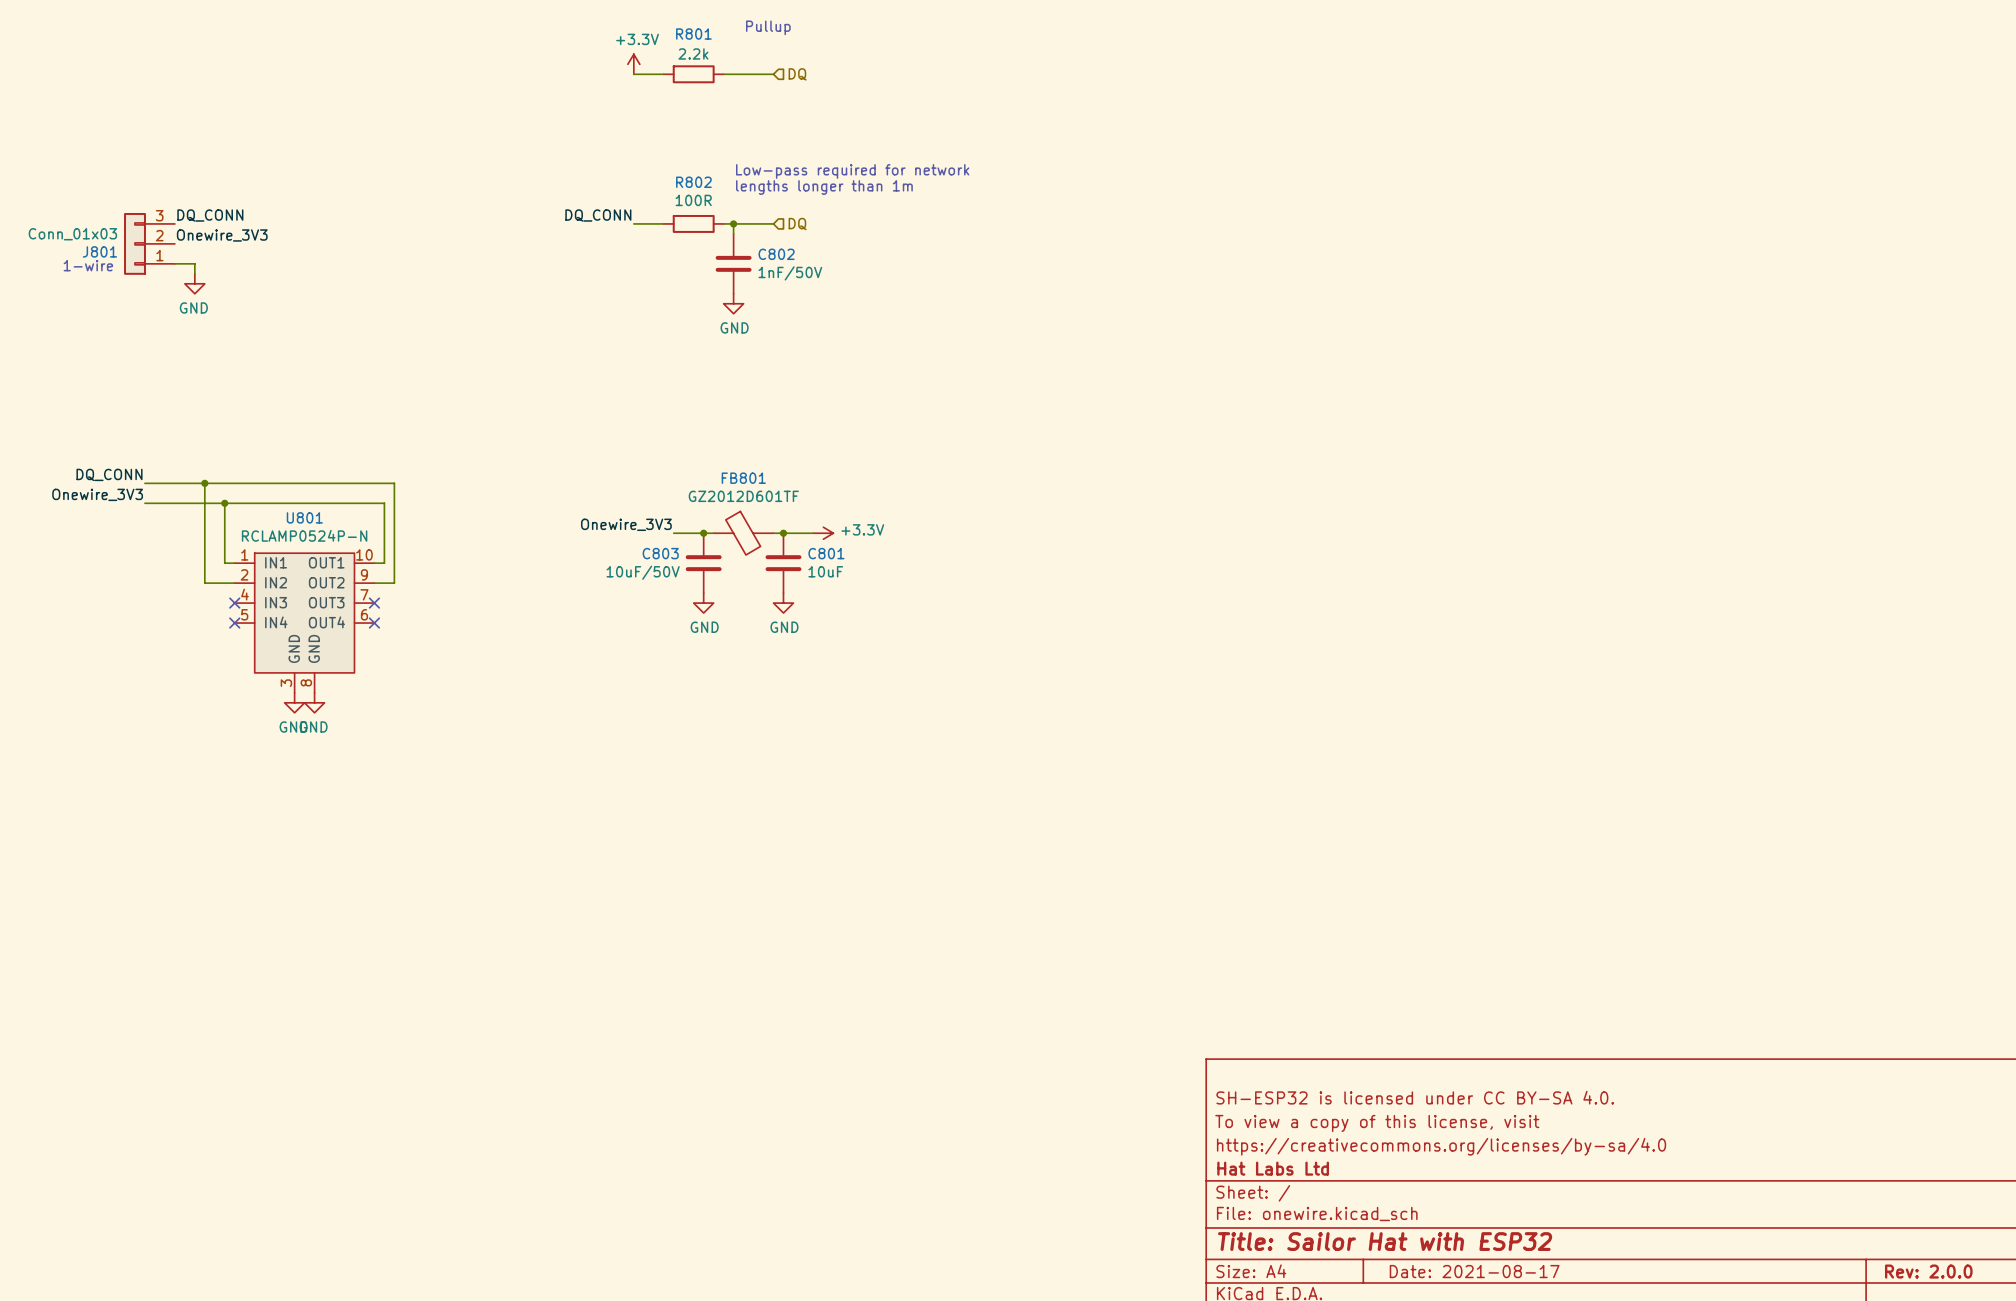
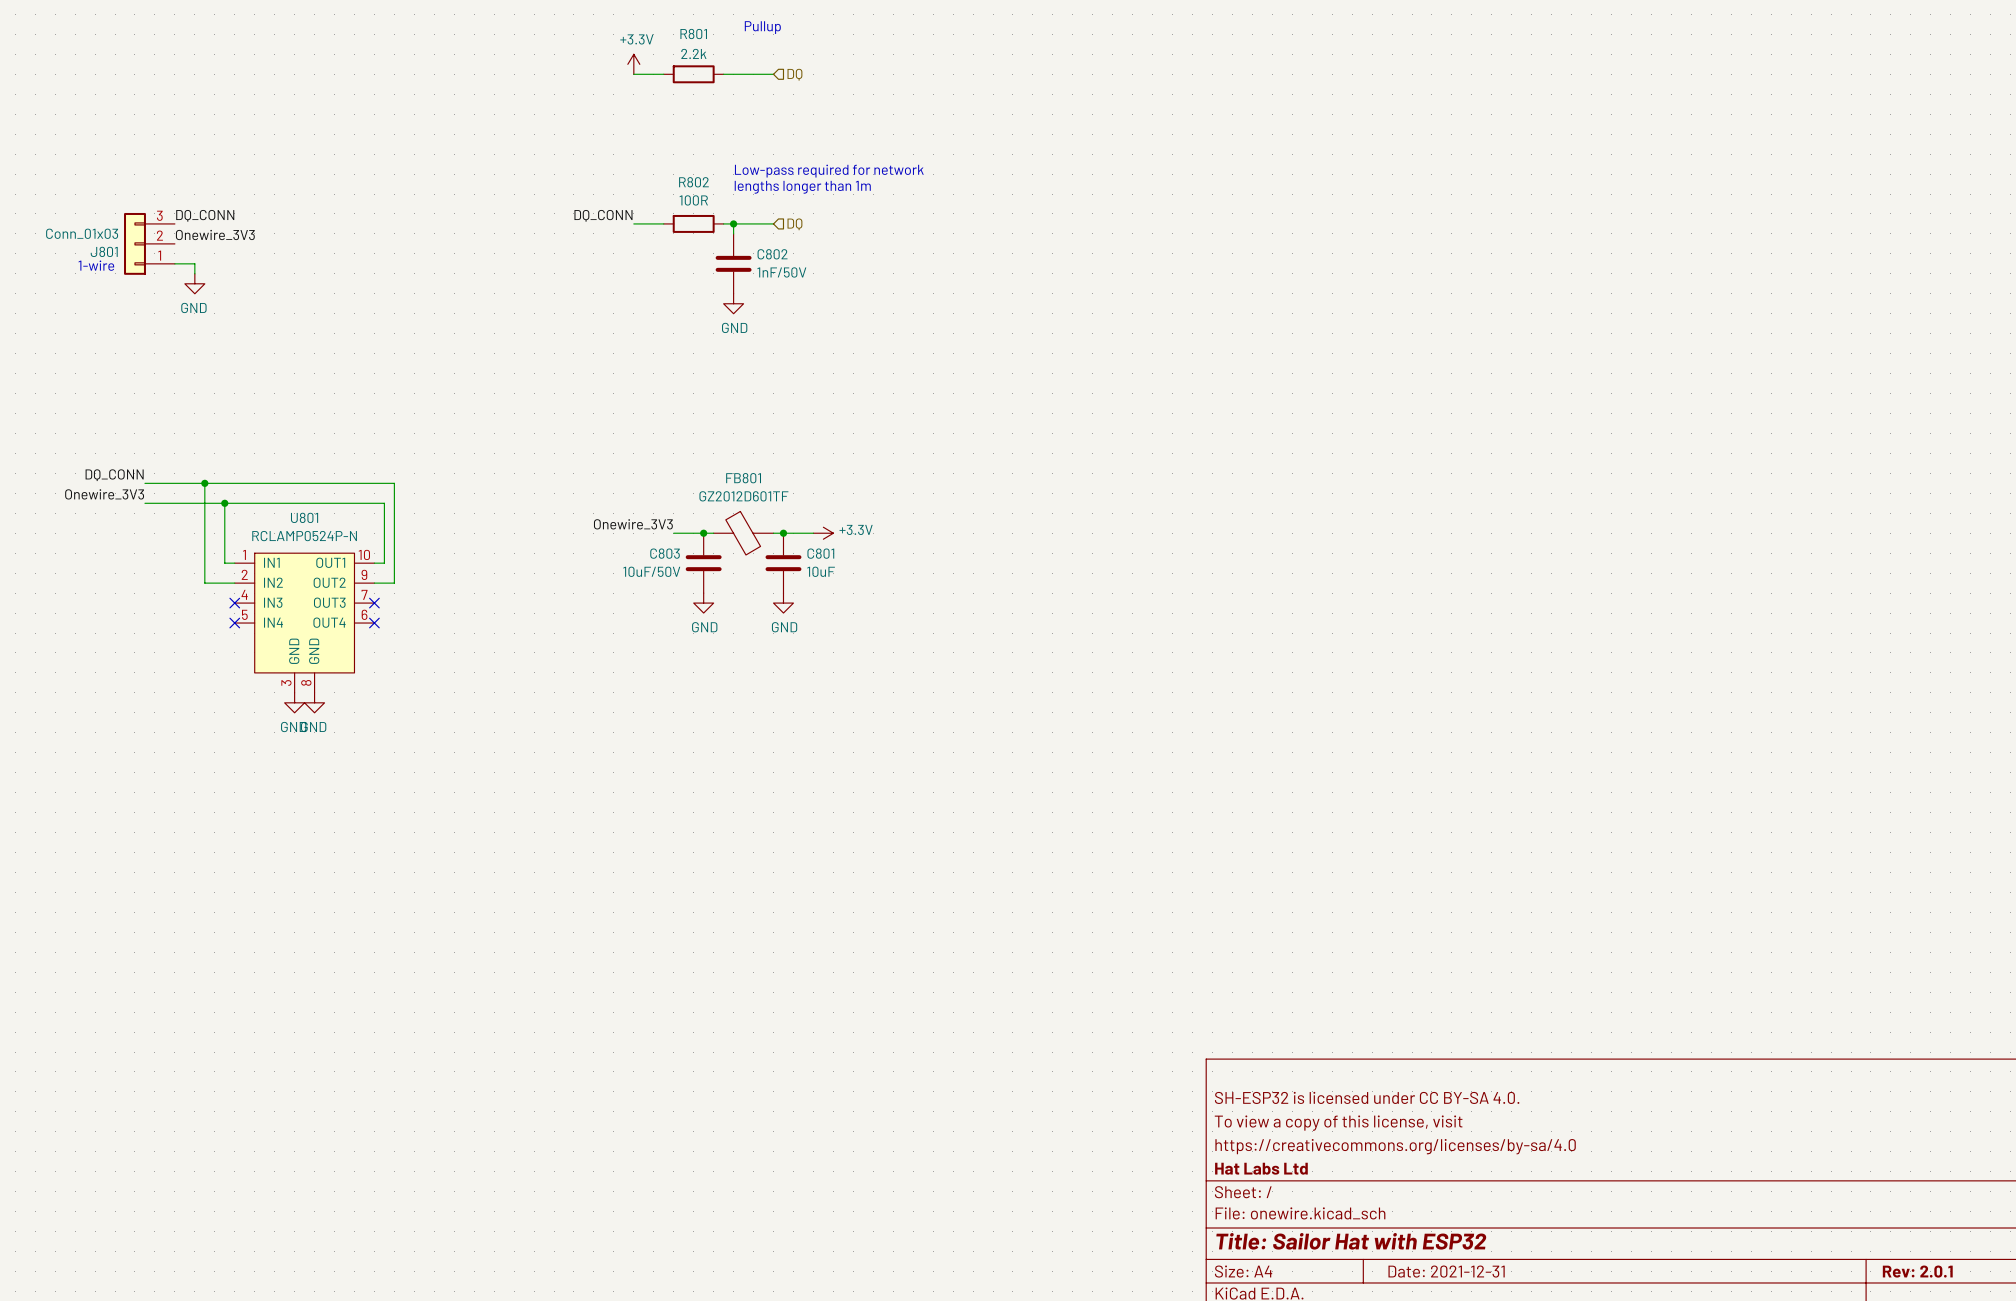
title block: Date: 2021-08-17 (1474, 1271) -> Date: 2021-12-31 (1446, 1271)
title block: Rev: 2.0.0 (1928, 1271) -> Rev: 2.0.1 (1917, 1271)

